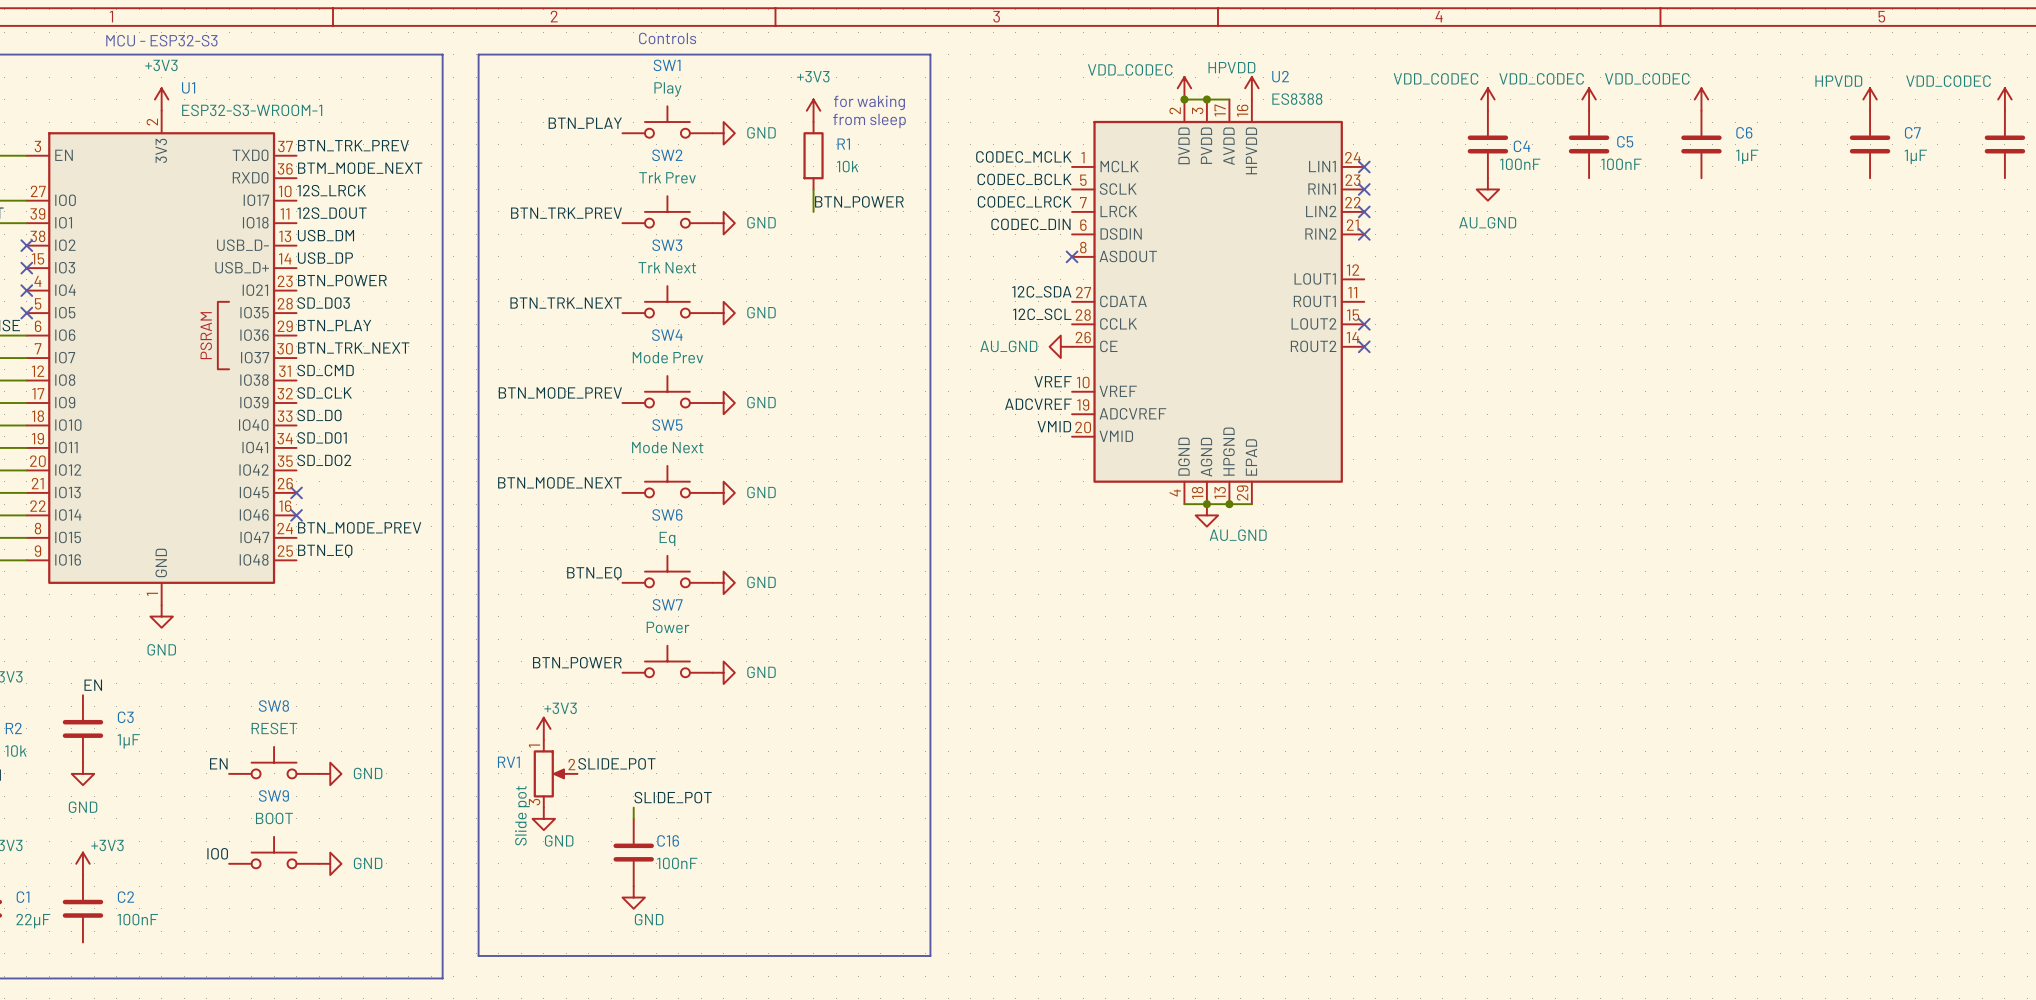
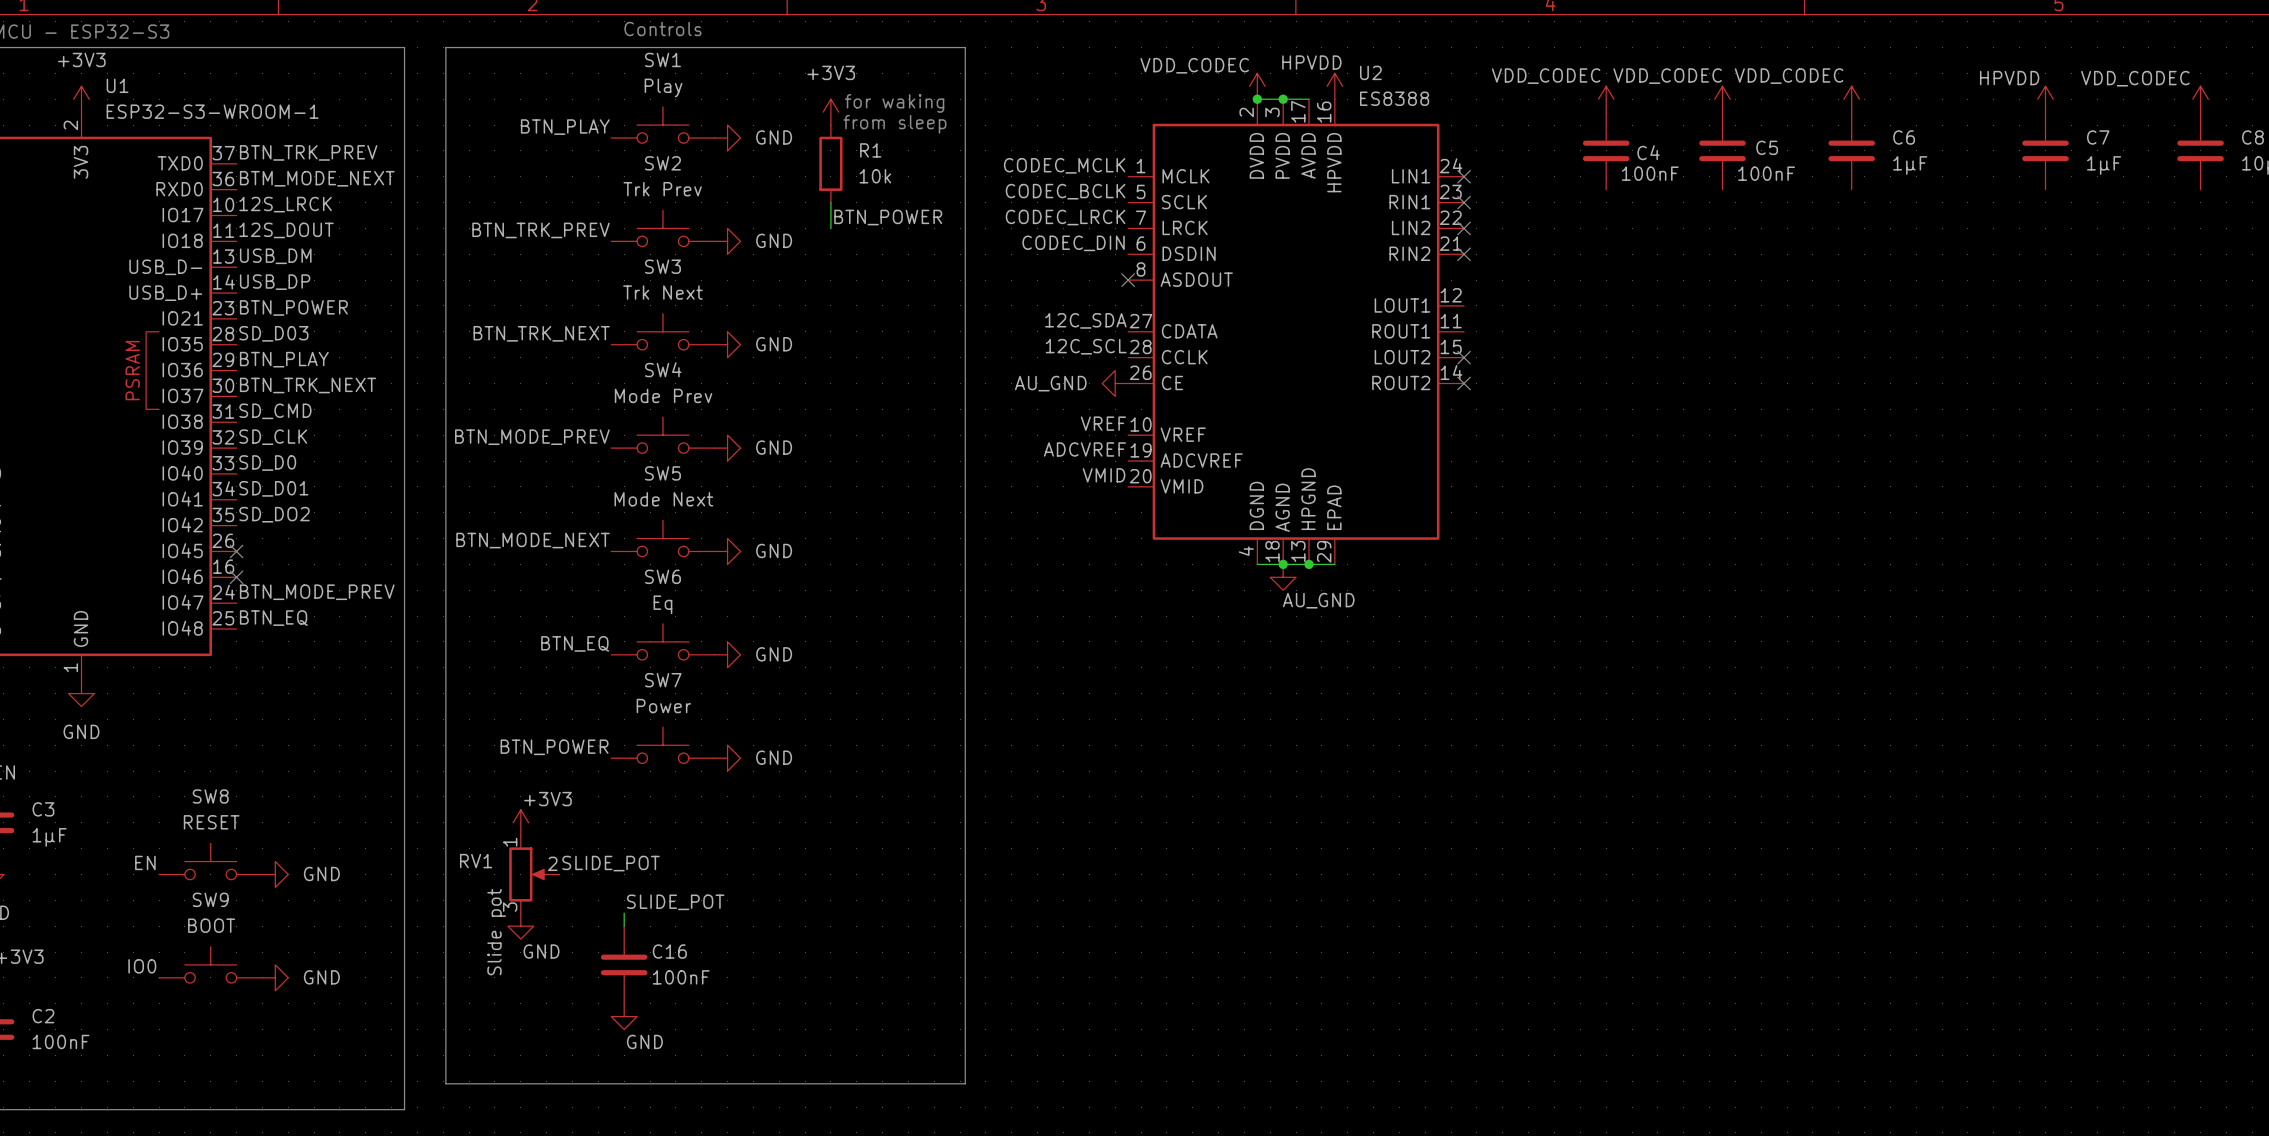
power symbol: AU_GND (1487, 189) -> none

